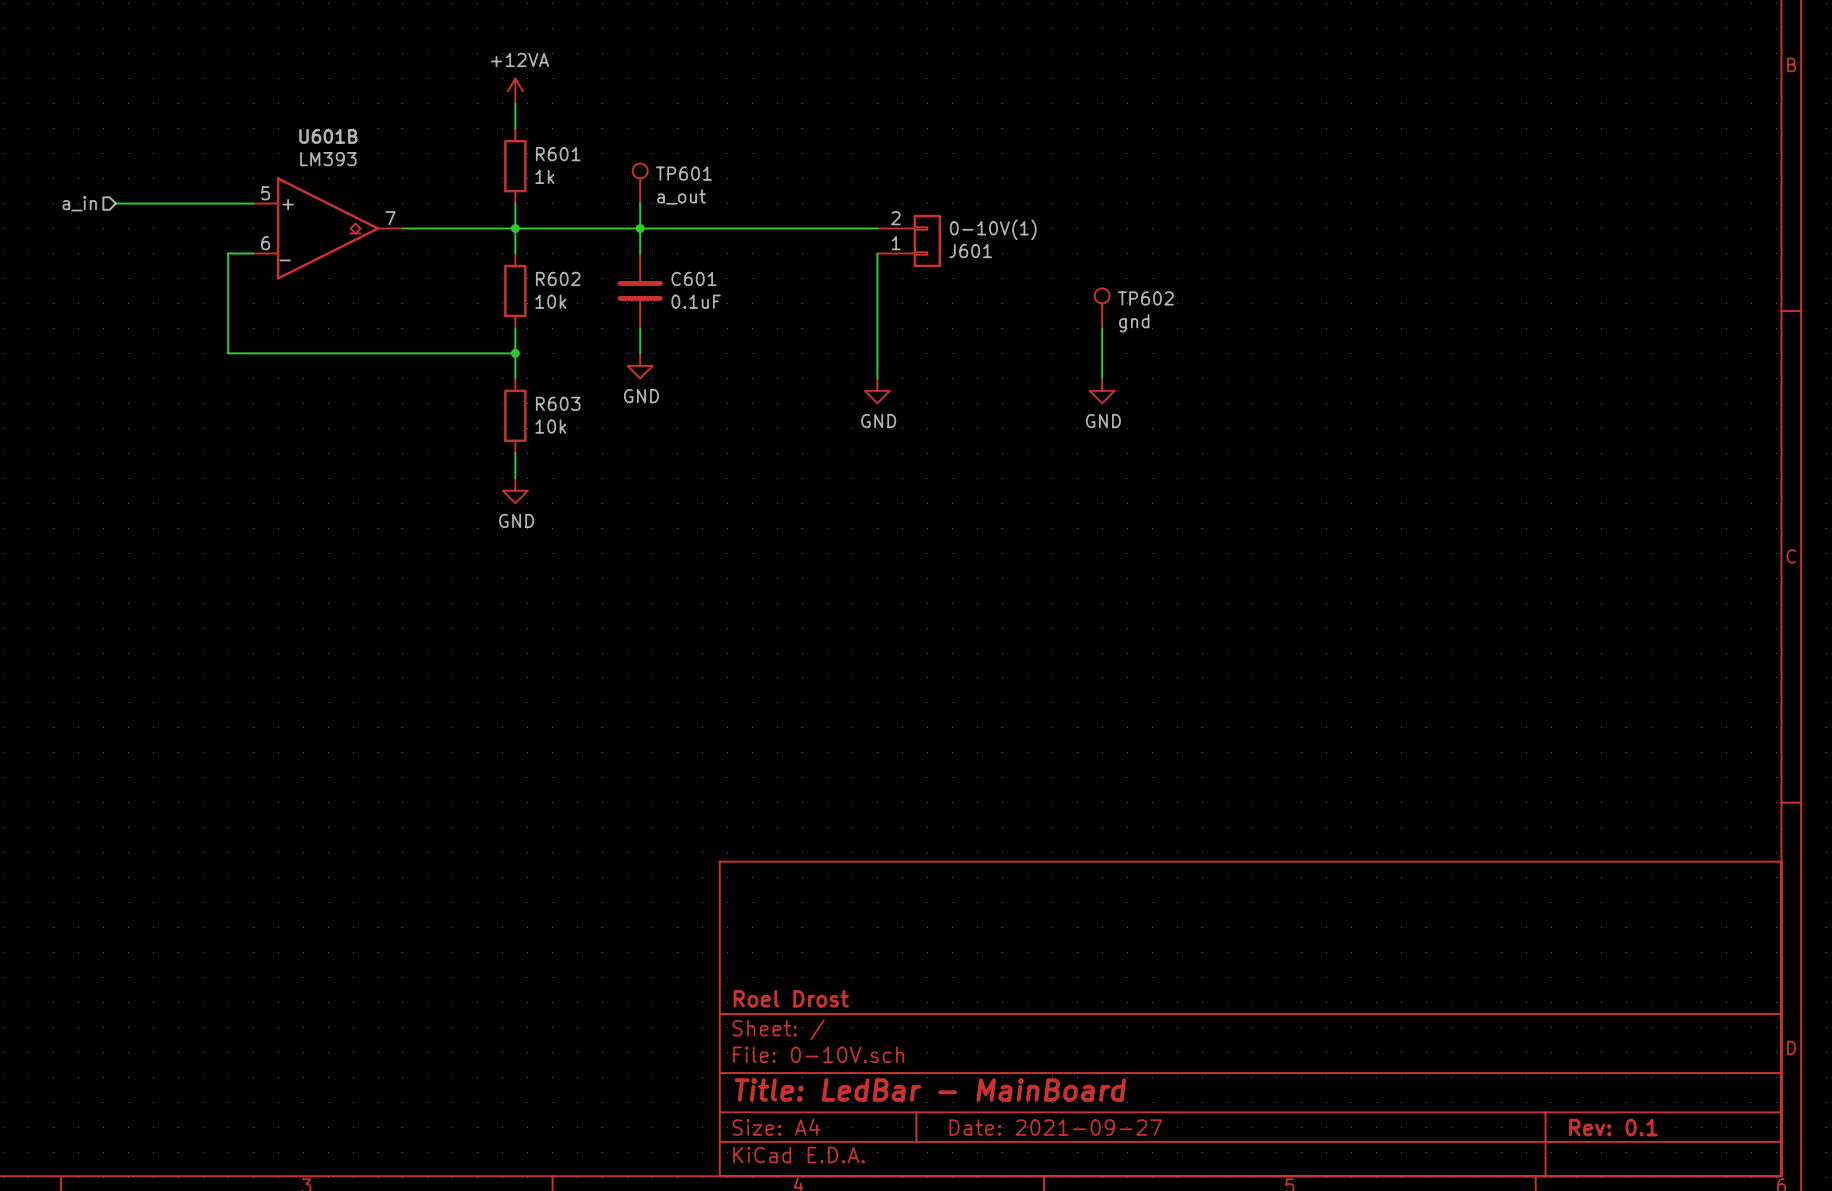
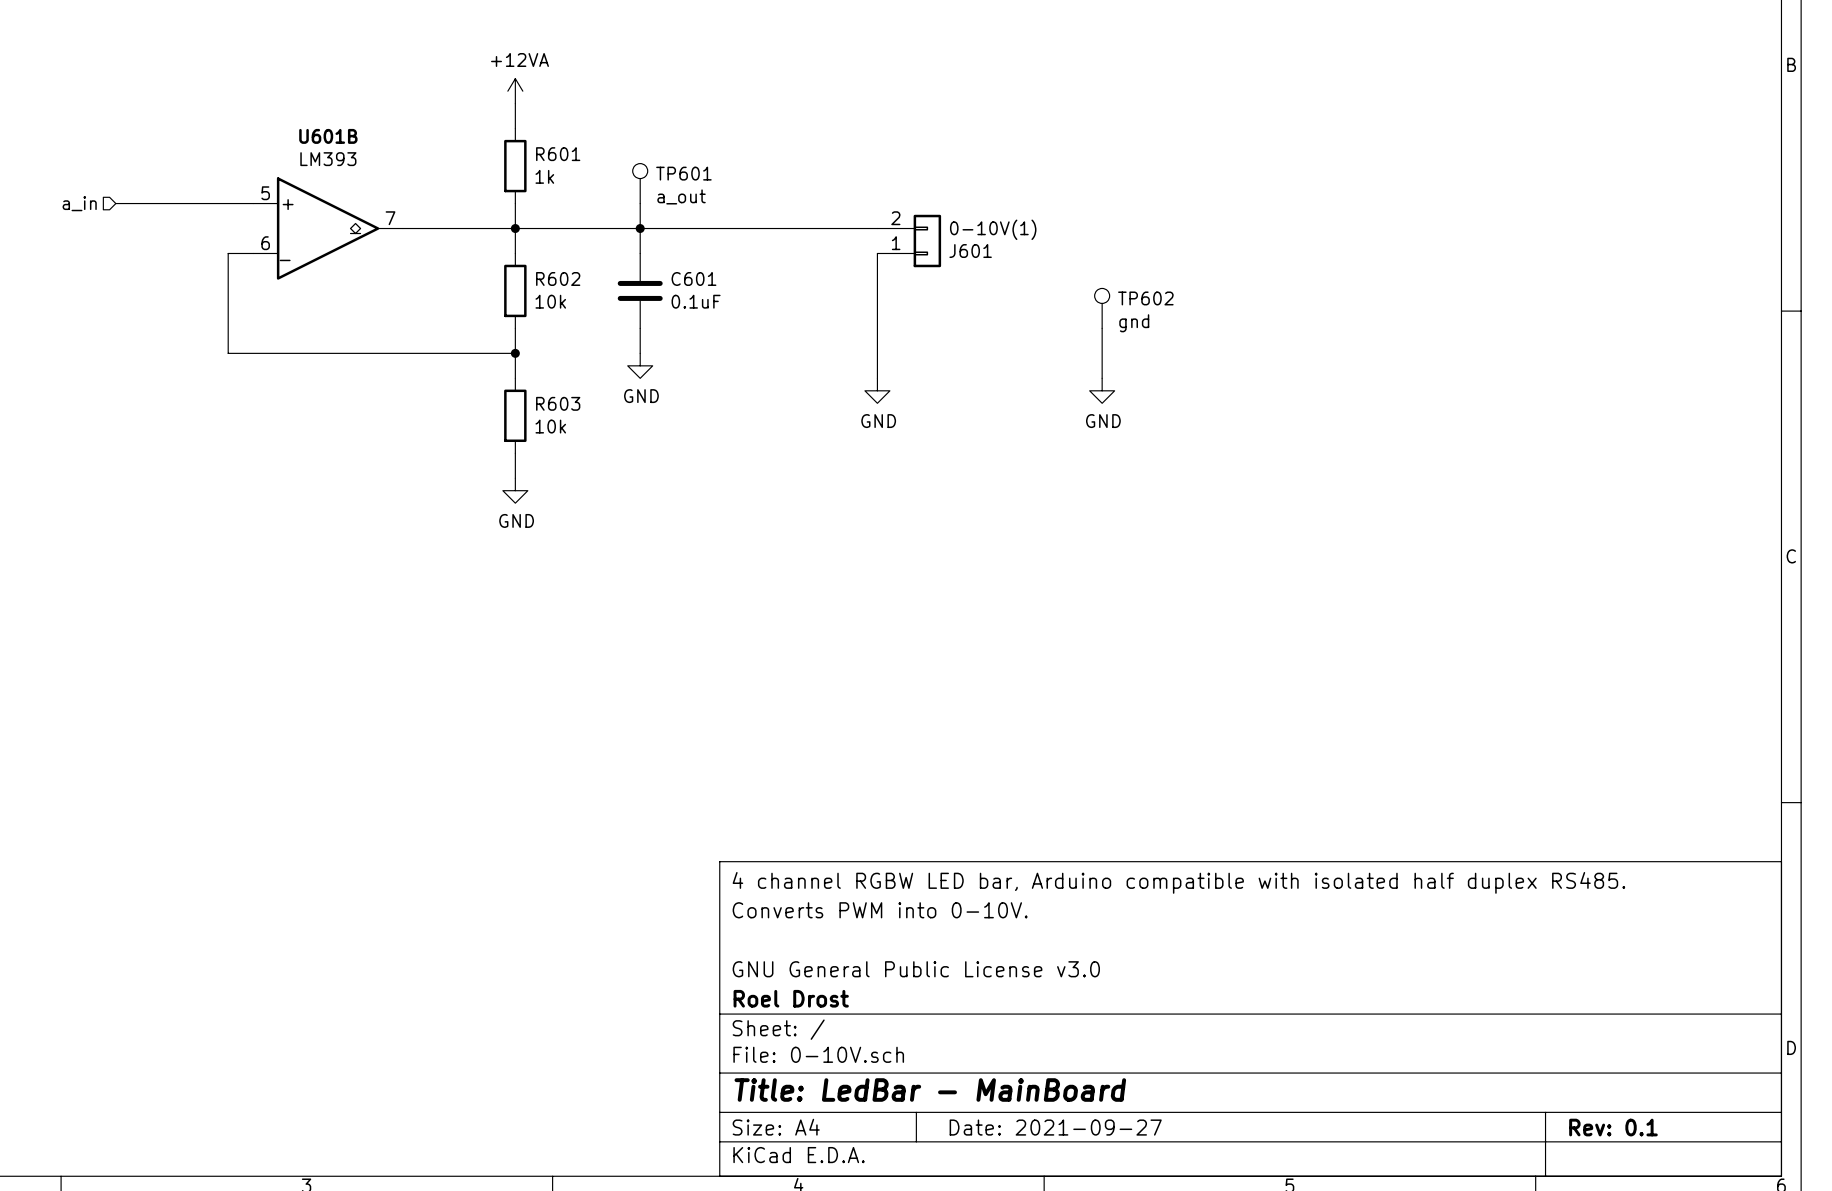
title block: none -> 4 channel RGBW LED bar, Arduino compatible with isolated half duplex RS485. (1178, 882)
title block: none -> Converts PWM into 0-10V. (880, 910)
title block: none -> GNU General Public License v3.0 (916, 969)

